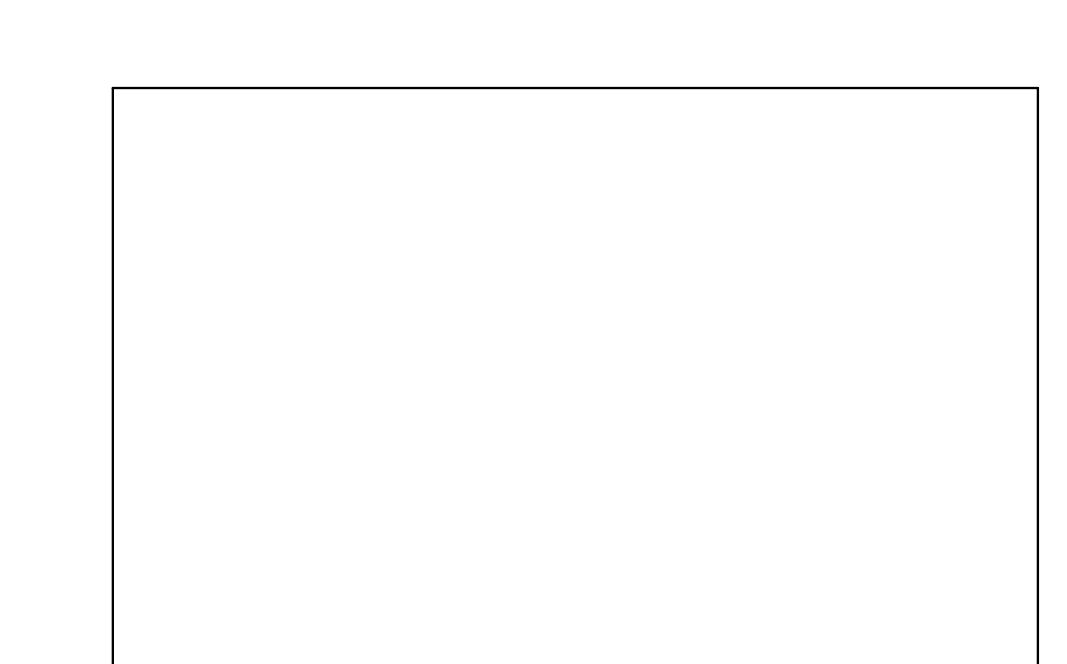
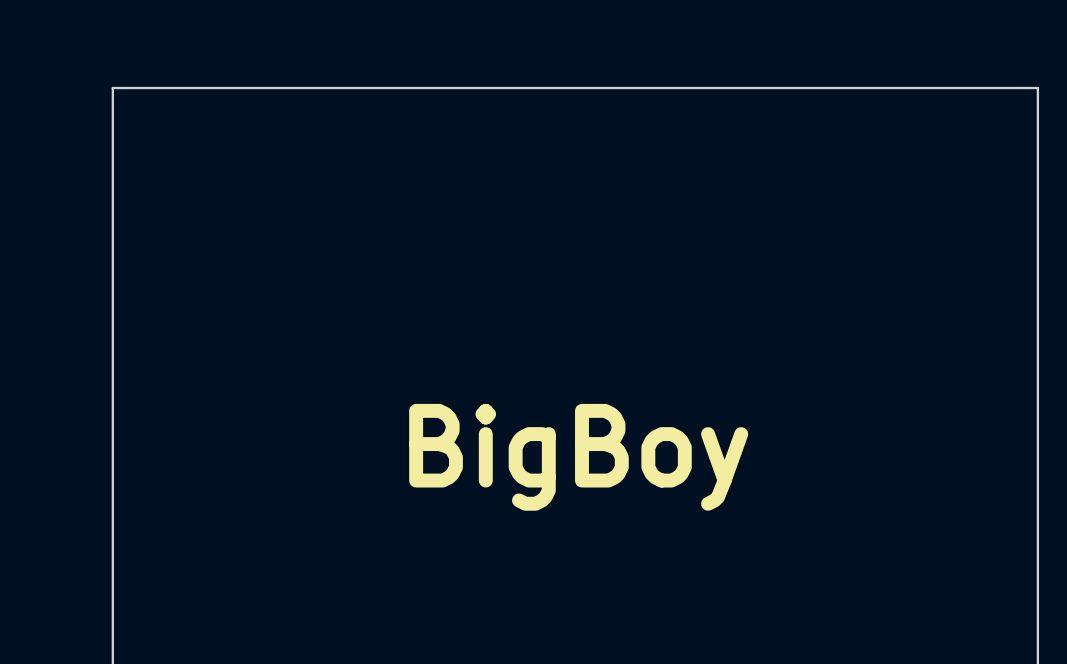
text: none -> BigBoy (578, 457)

